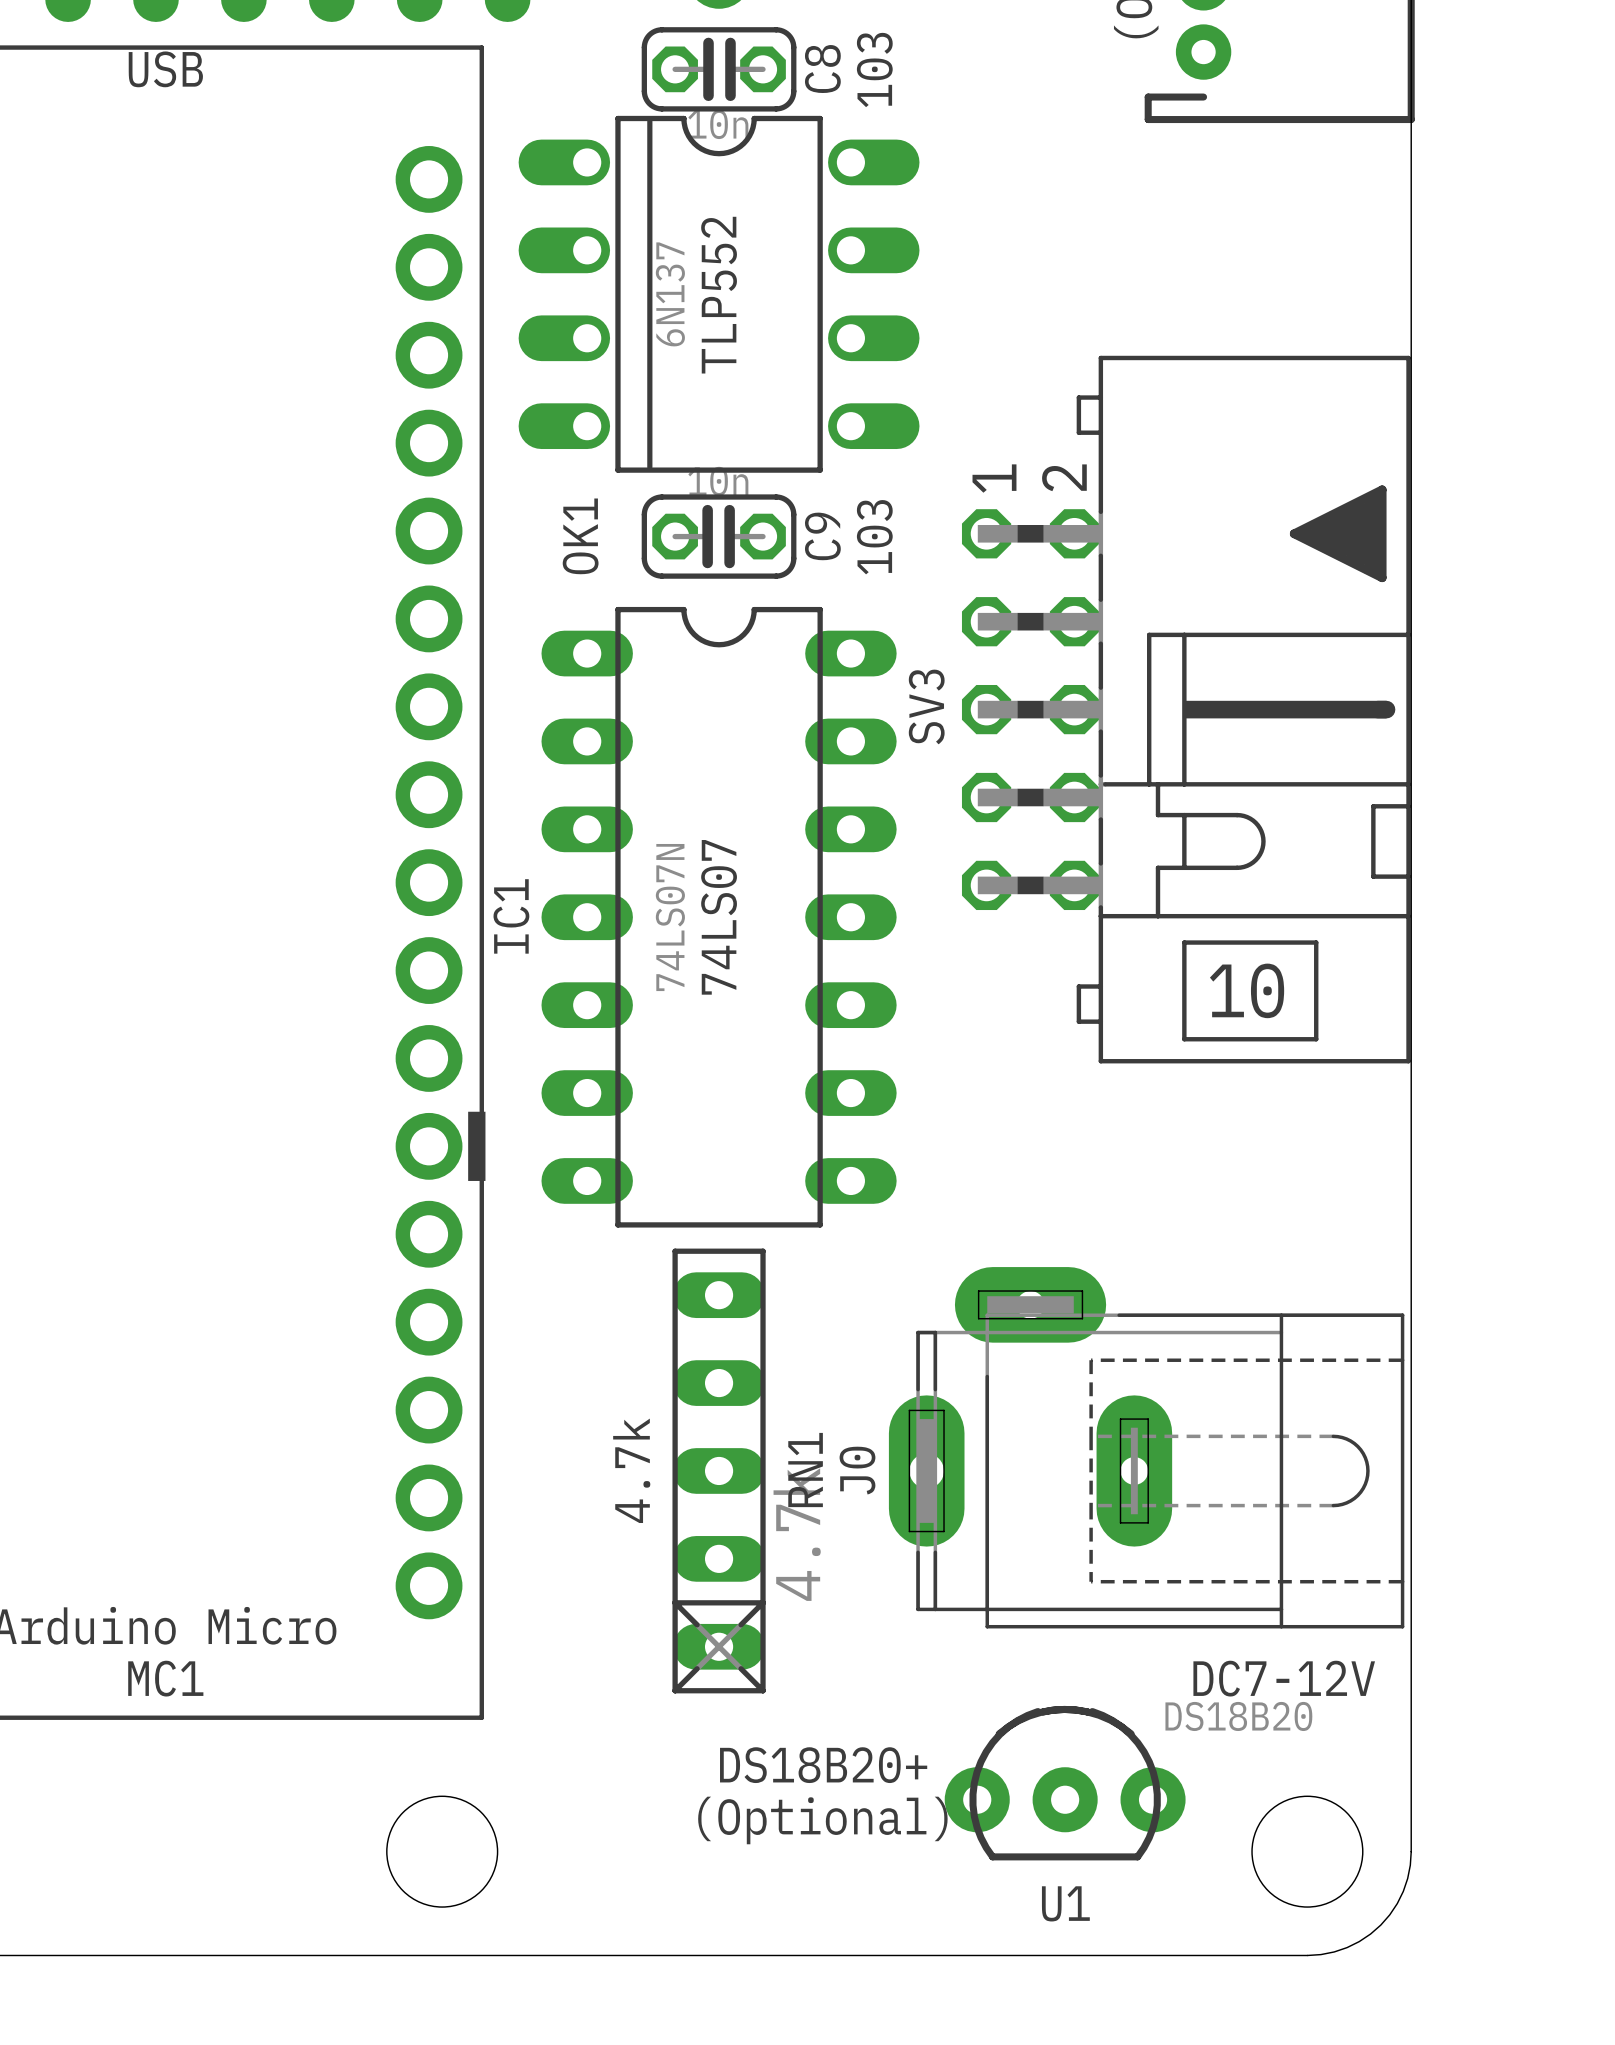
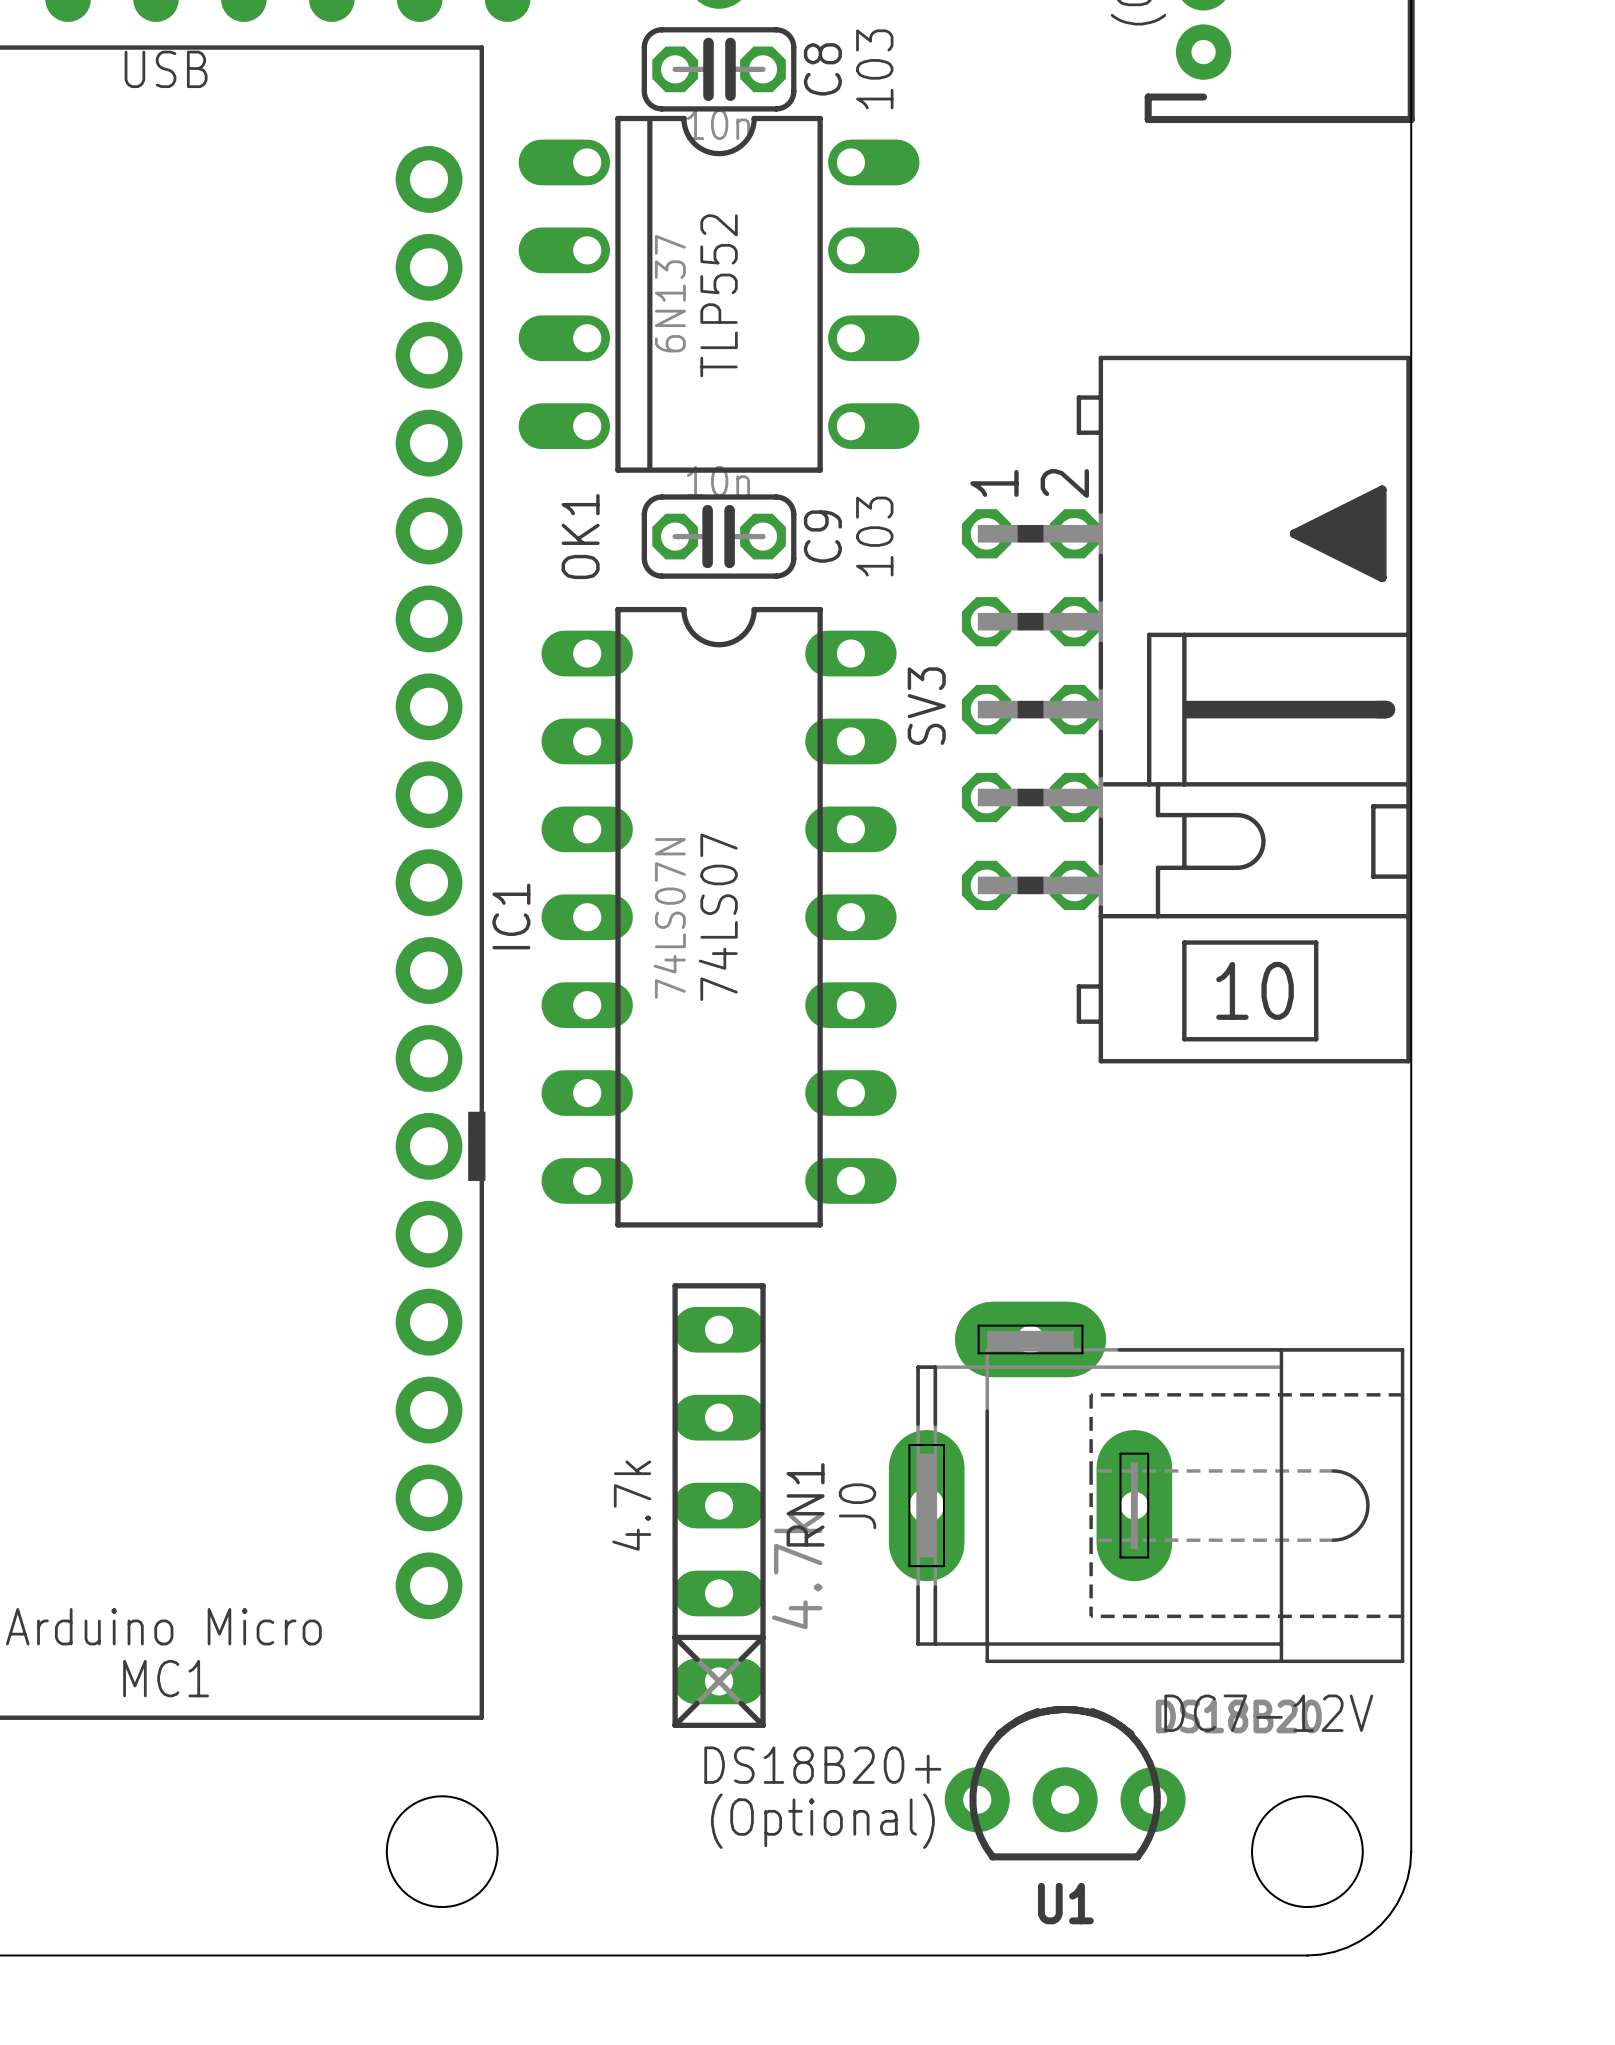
J0 position: (1146, 1447) -> (1146, 1482)
text position: 4.7k (631, 1470) -> 4.7k (631, 1505)
RN1 position: (719, 1470) -> (719, 1505)
text position: DC7-12V (1284, 1678) -> DC7-12V (1268, 1713)

